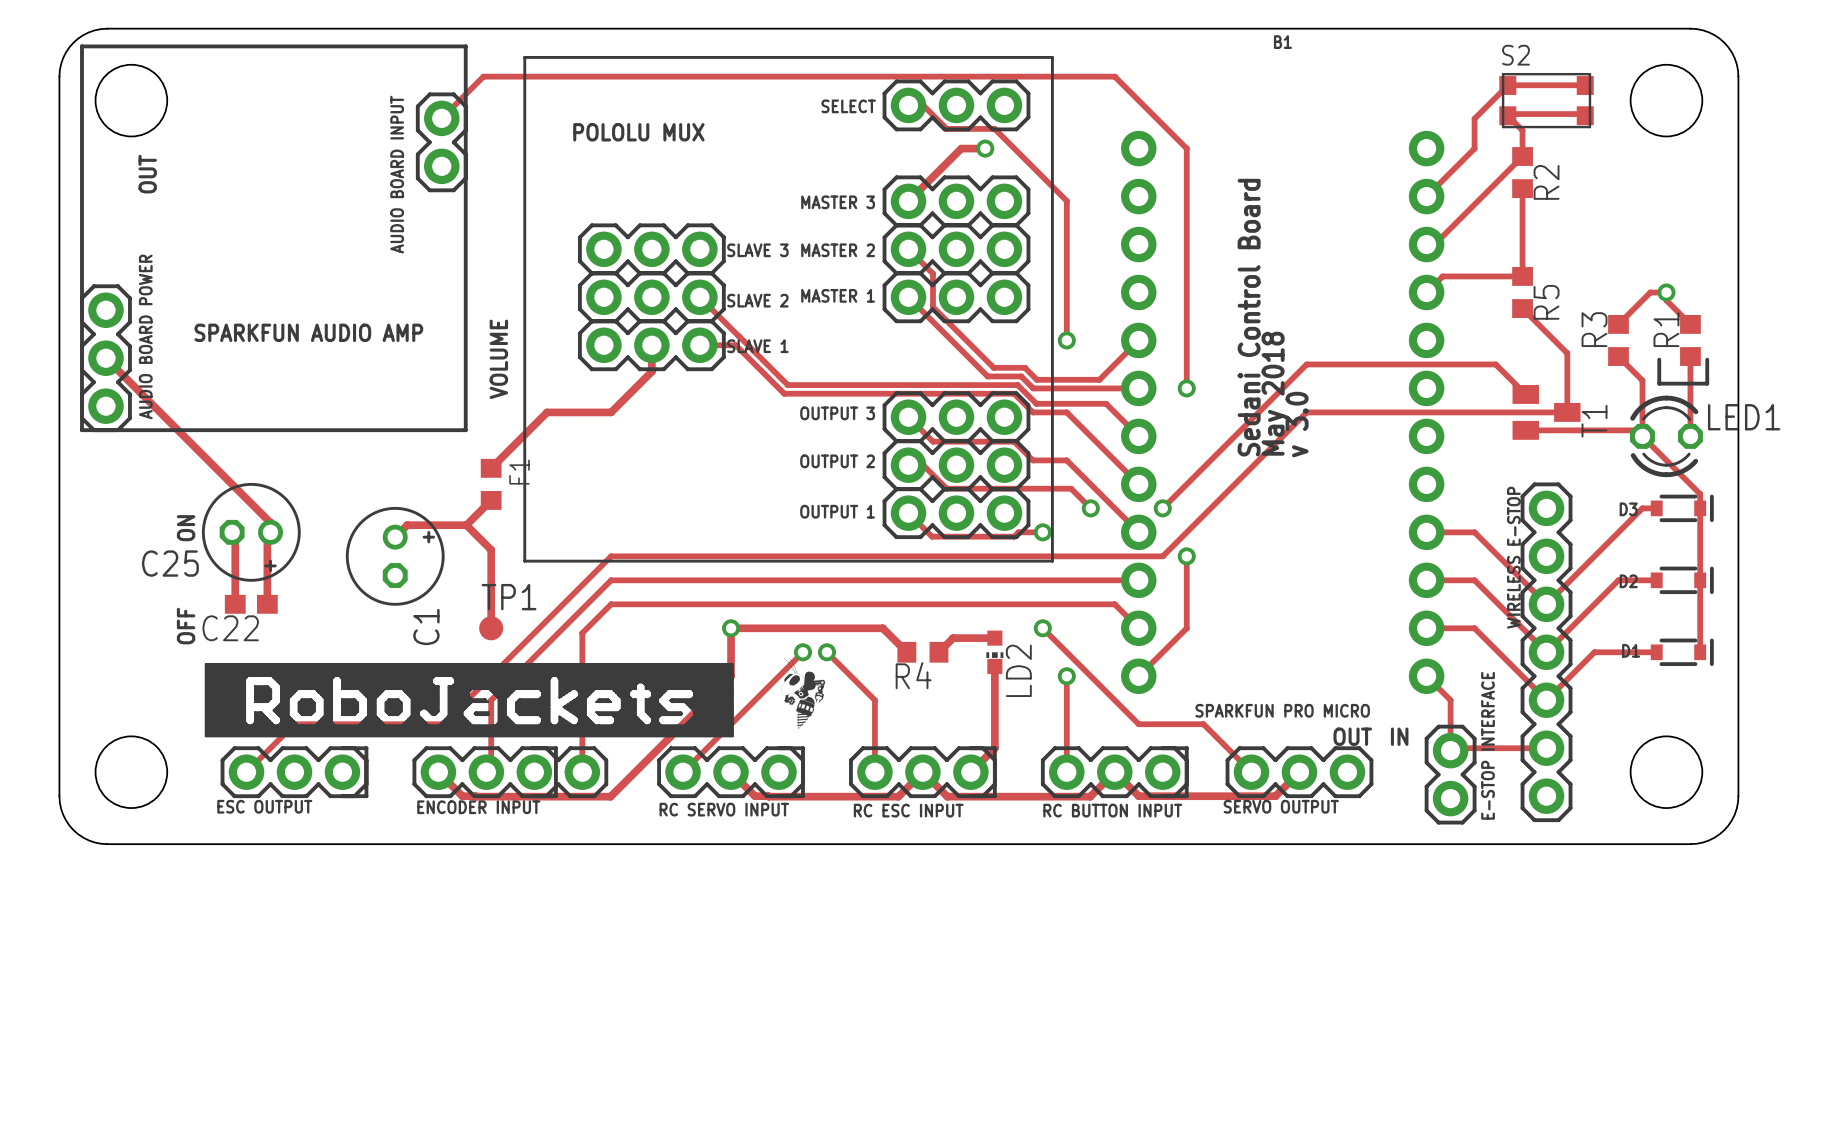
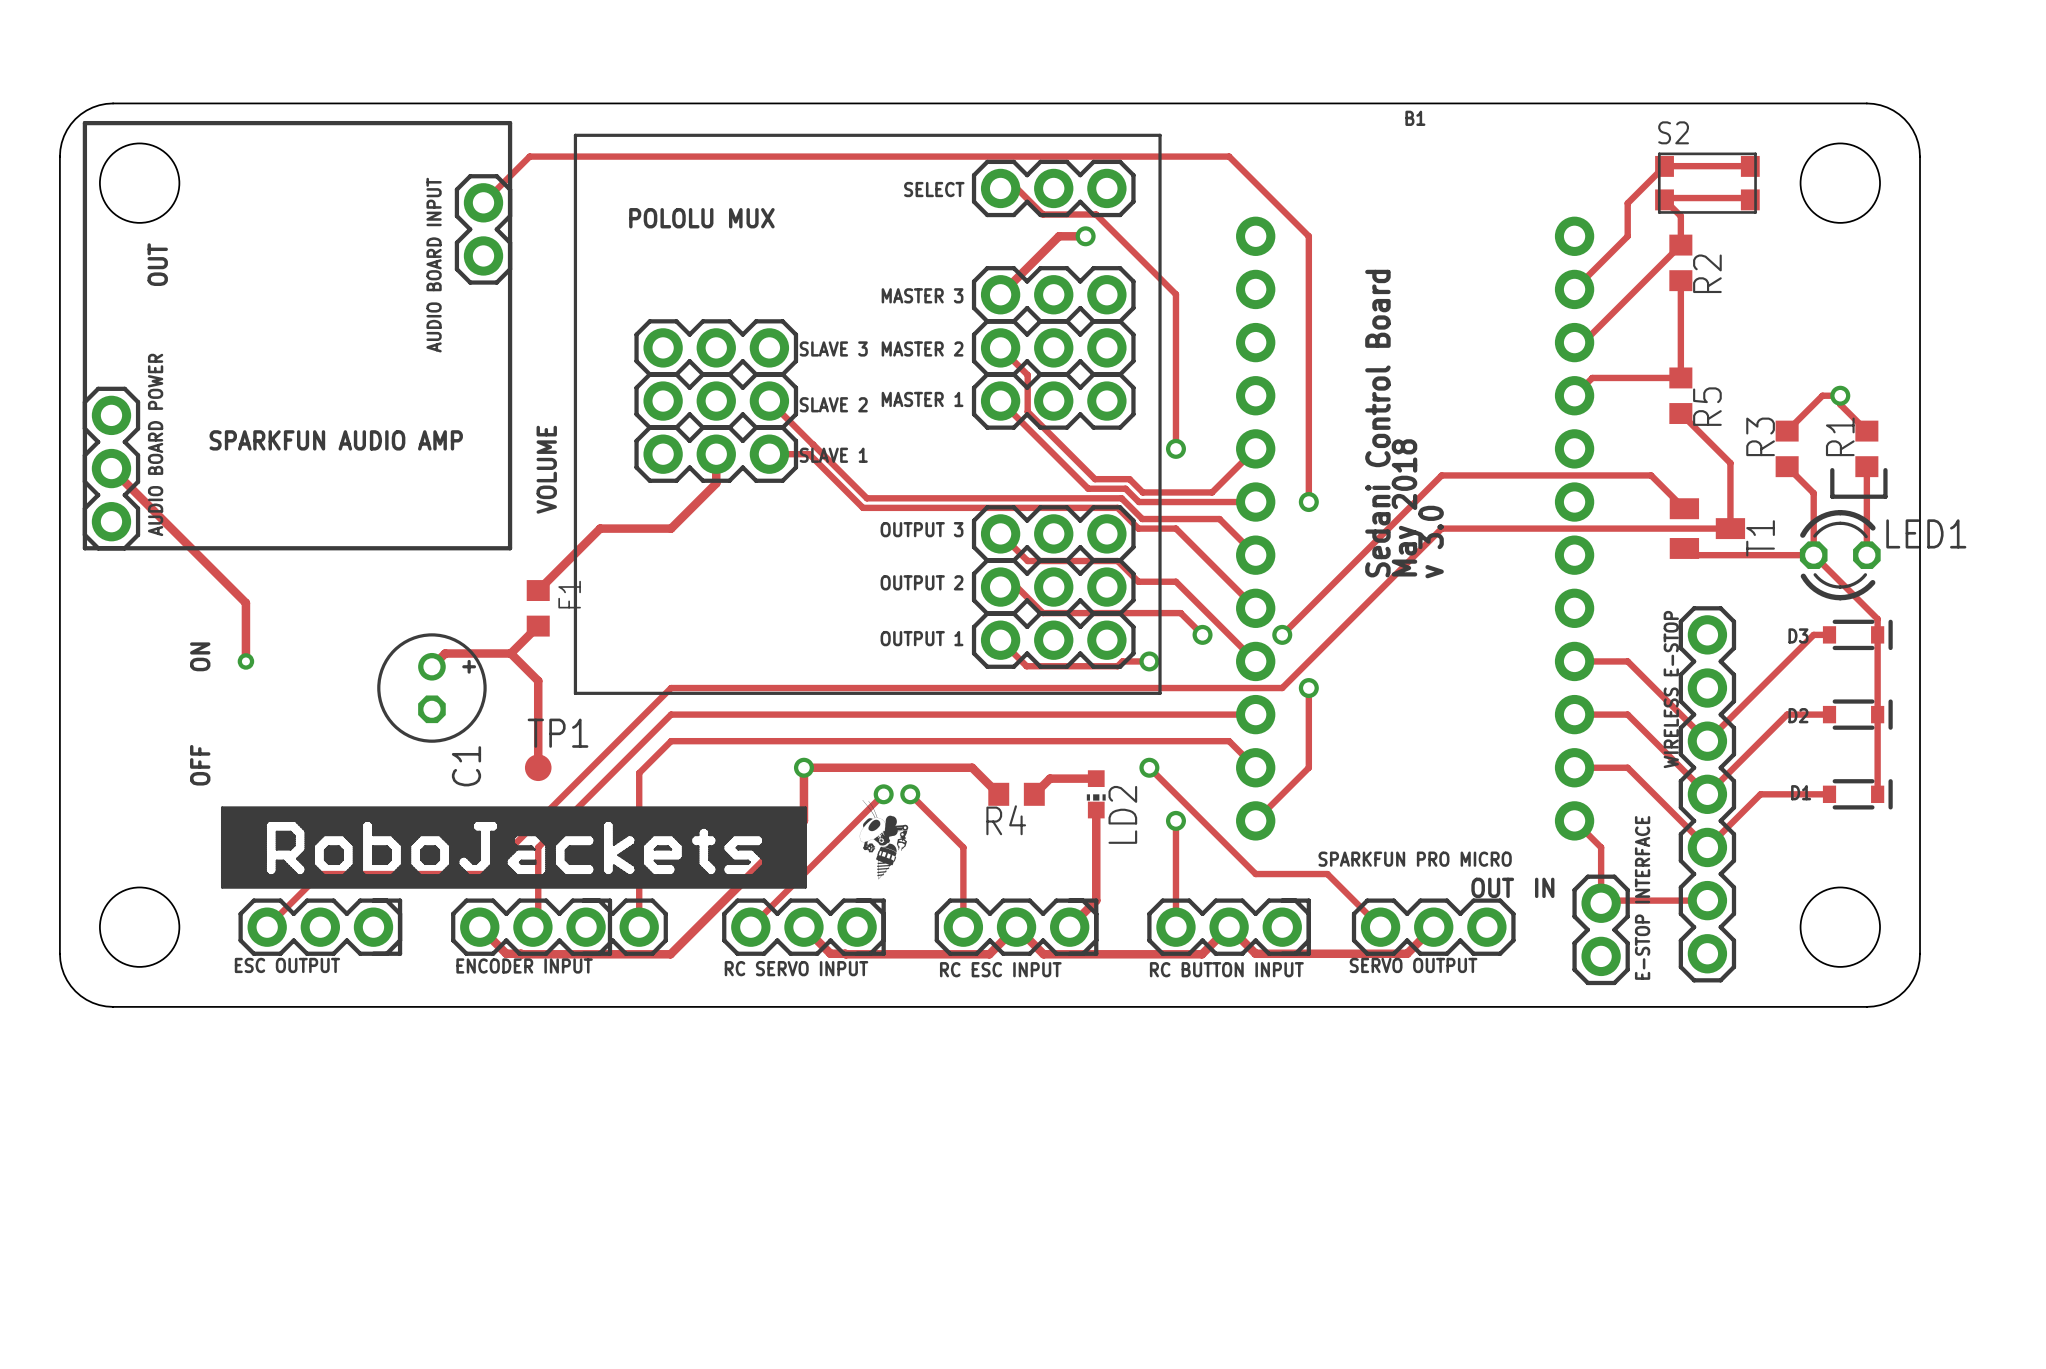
track: (1523, 428) (1525, 430) (1636, 430) -> none
track: none -> (1684, 548) (1691, 555) (1813, 555)
track: (227, 479) (270, 522) (270, 532) (267, 535) (267, 604) -> (245, 603) (245, 661)
via: none -> (245, 661)
track: (232, 532) (235, 535) (235, 604) -> none
C25: (251, 532) -> none
C22: (251, 604) -> none

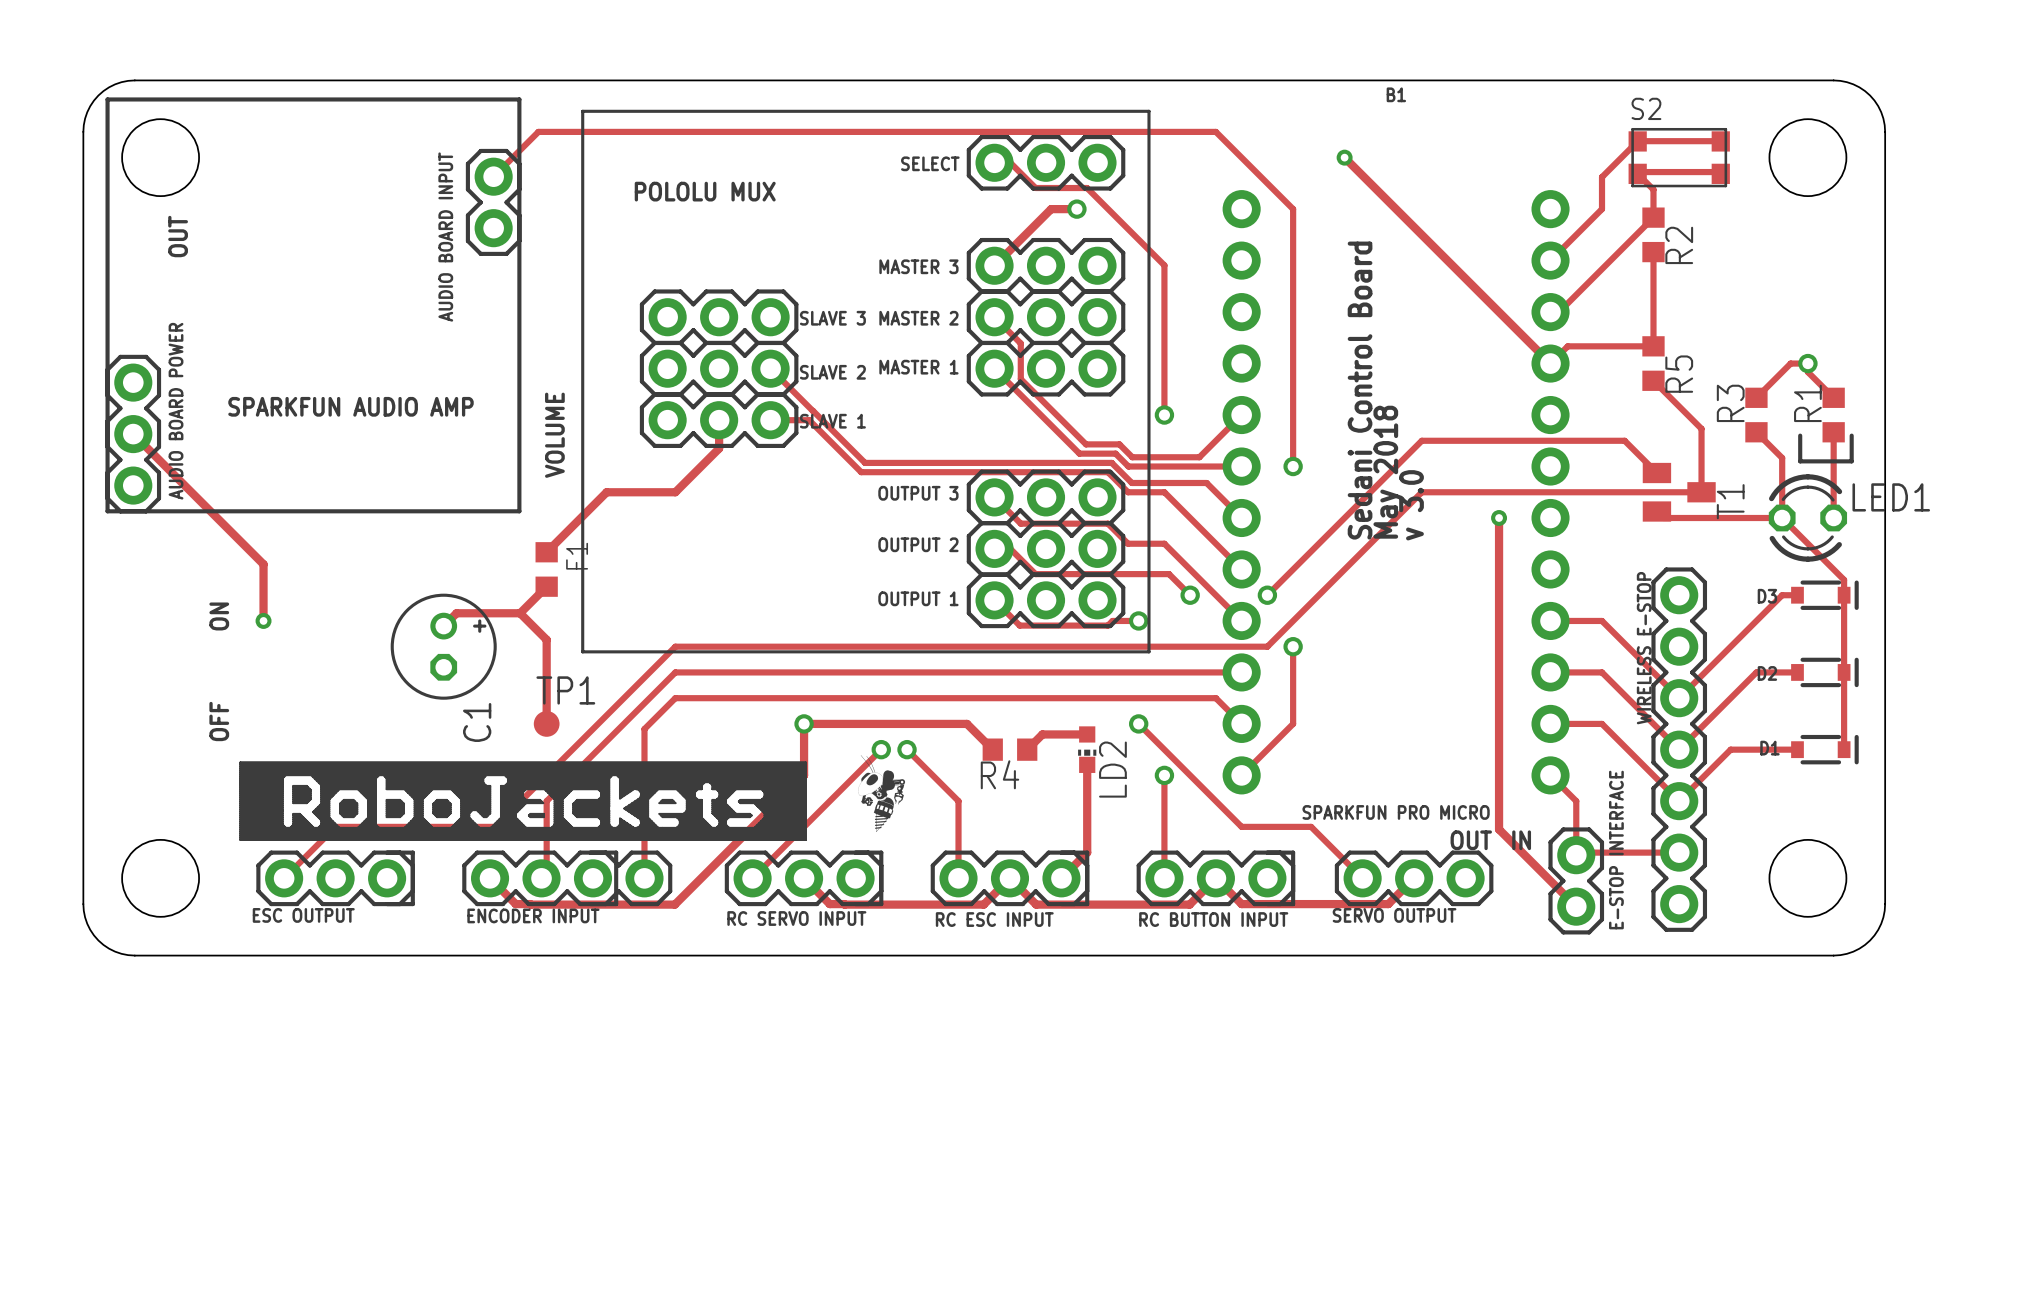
track: none -> (1344, 157) (1550, 363)
via: none -> (1344, 157)
track: none -> (1499, 518) (1499, 829) (1576, 906)
via: none -> (1499, 518)

